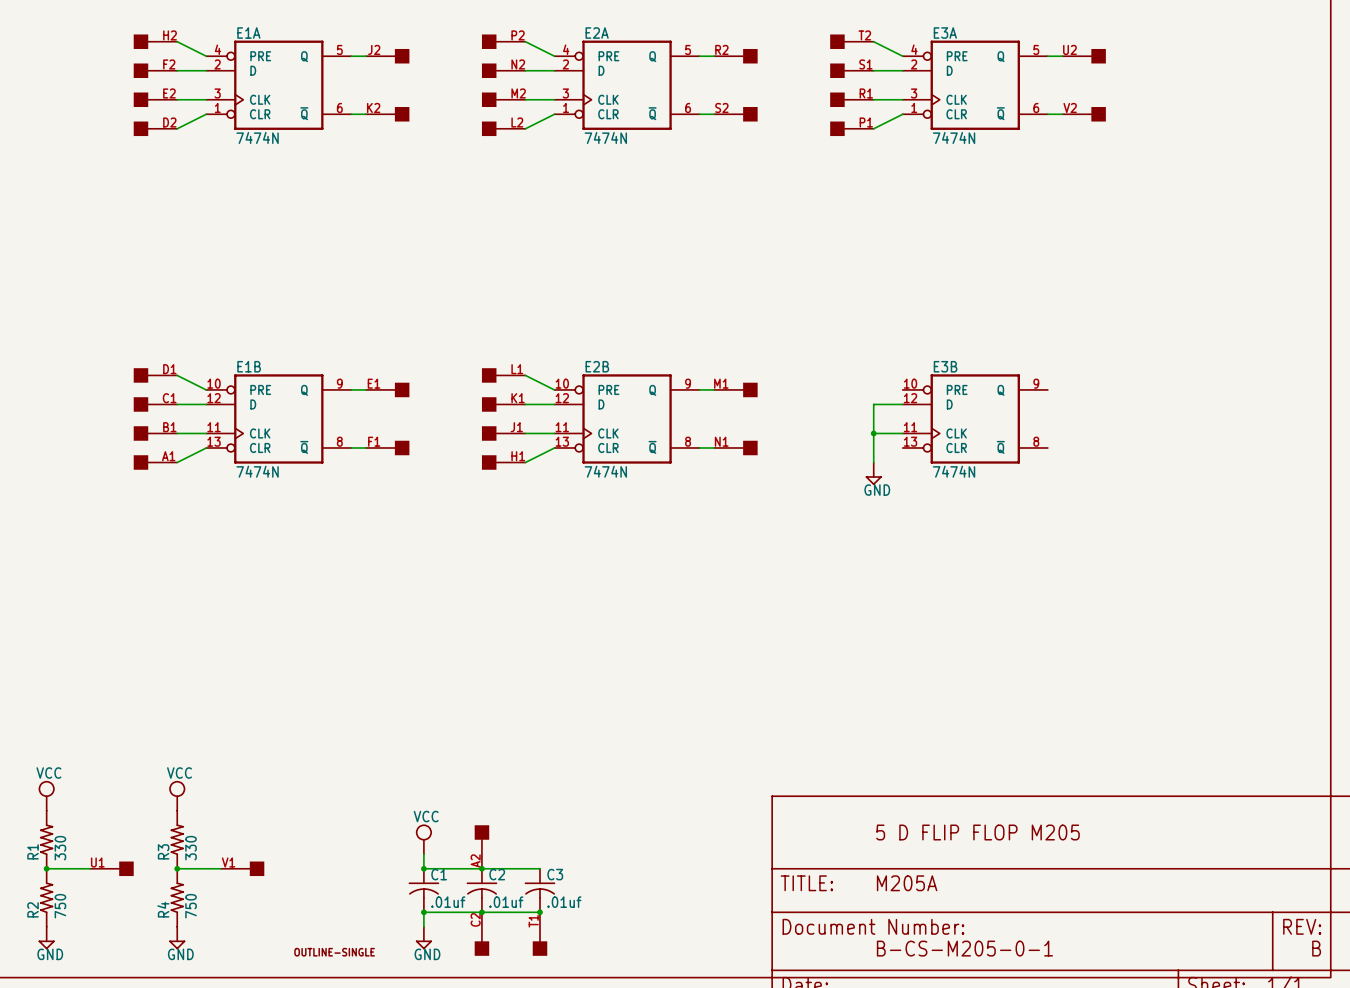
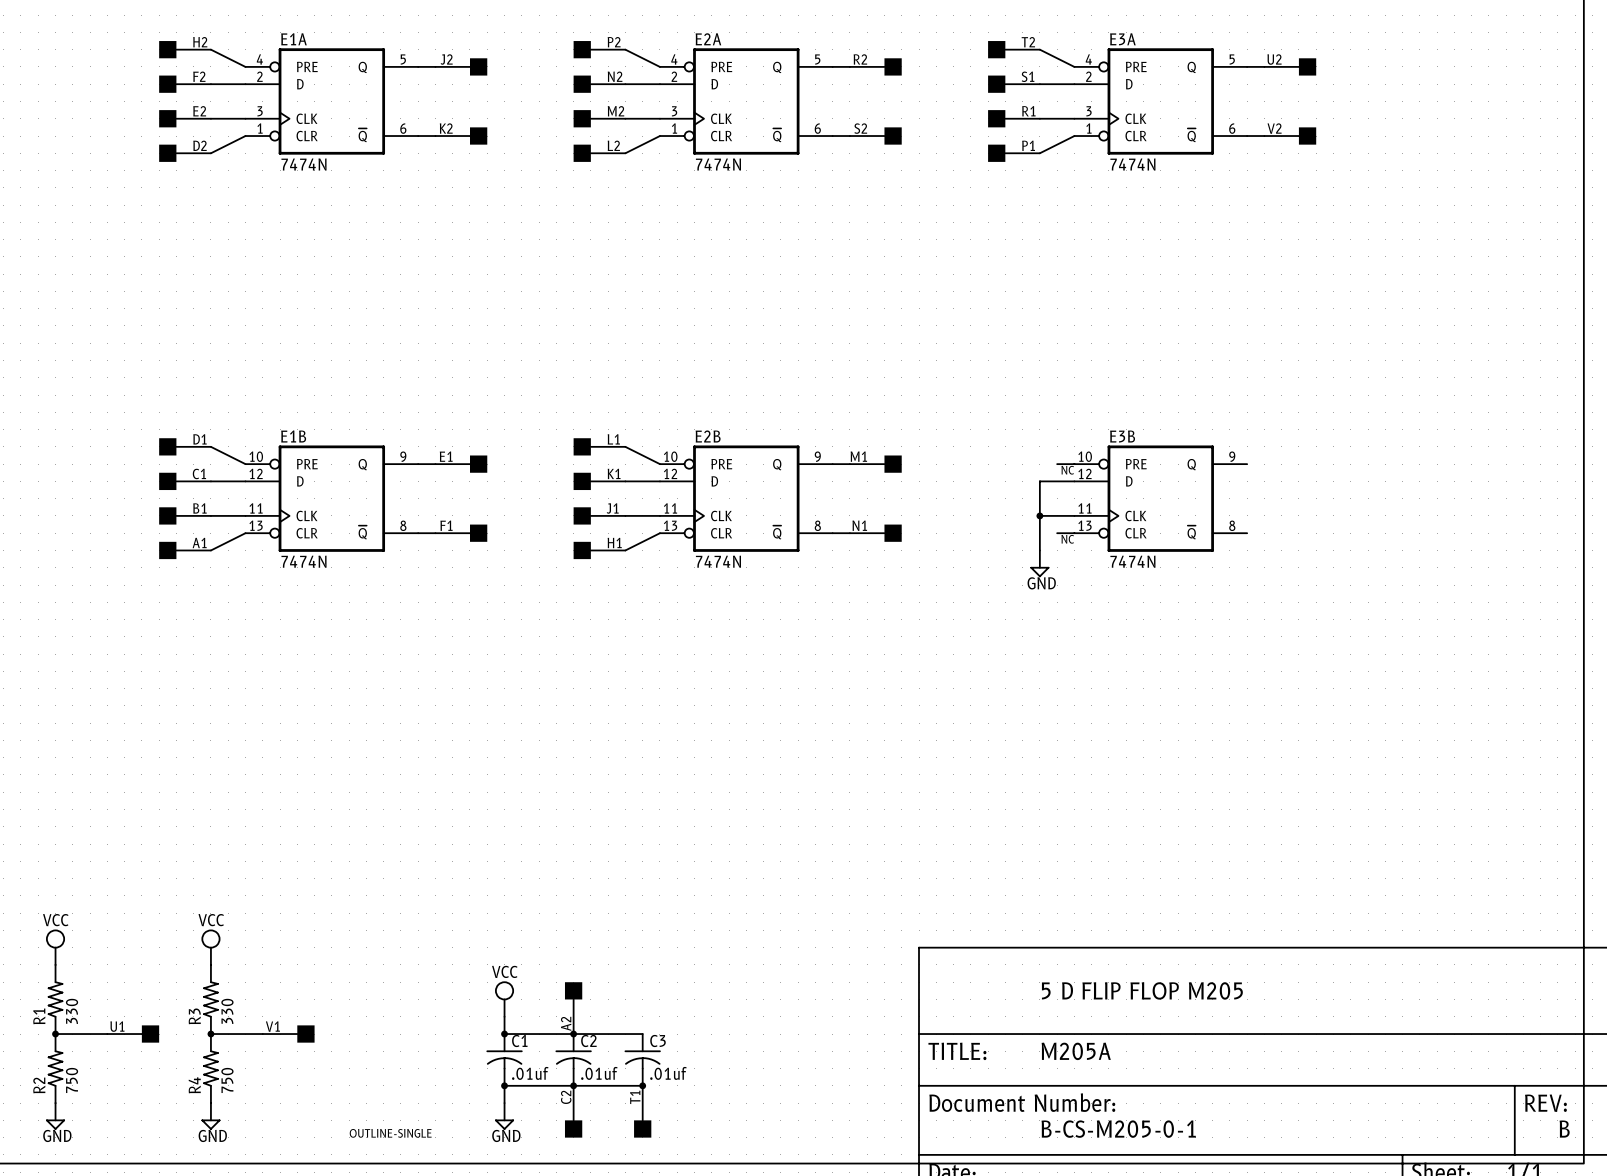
power symbol: none -> (1065, 464)
power symbol: none -> (1065, 533)

